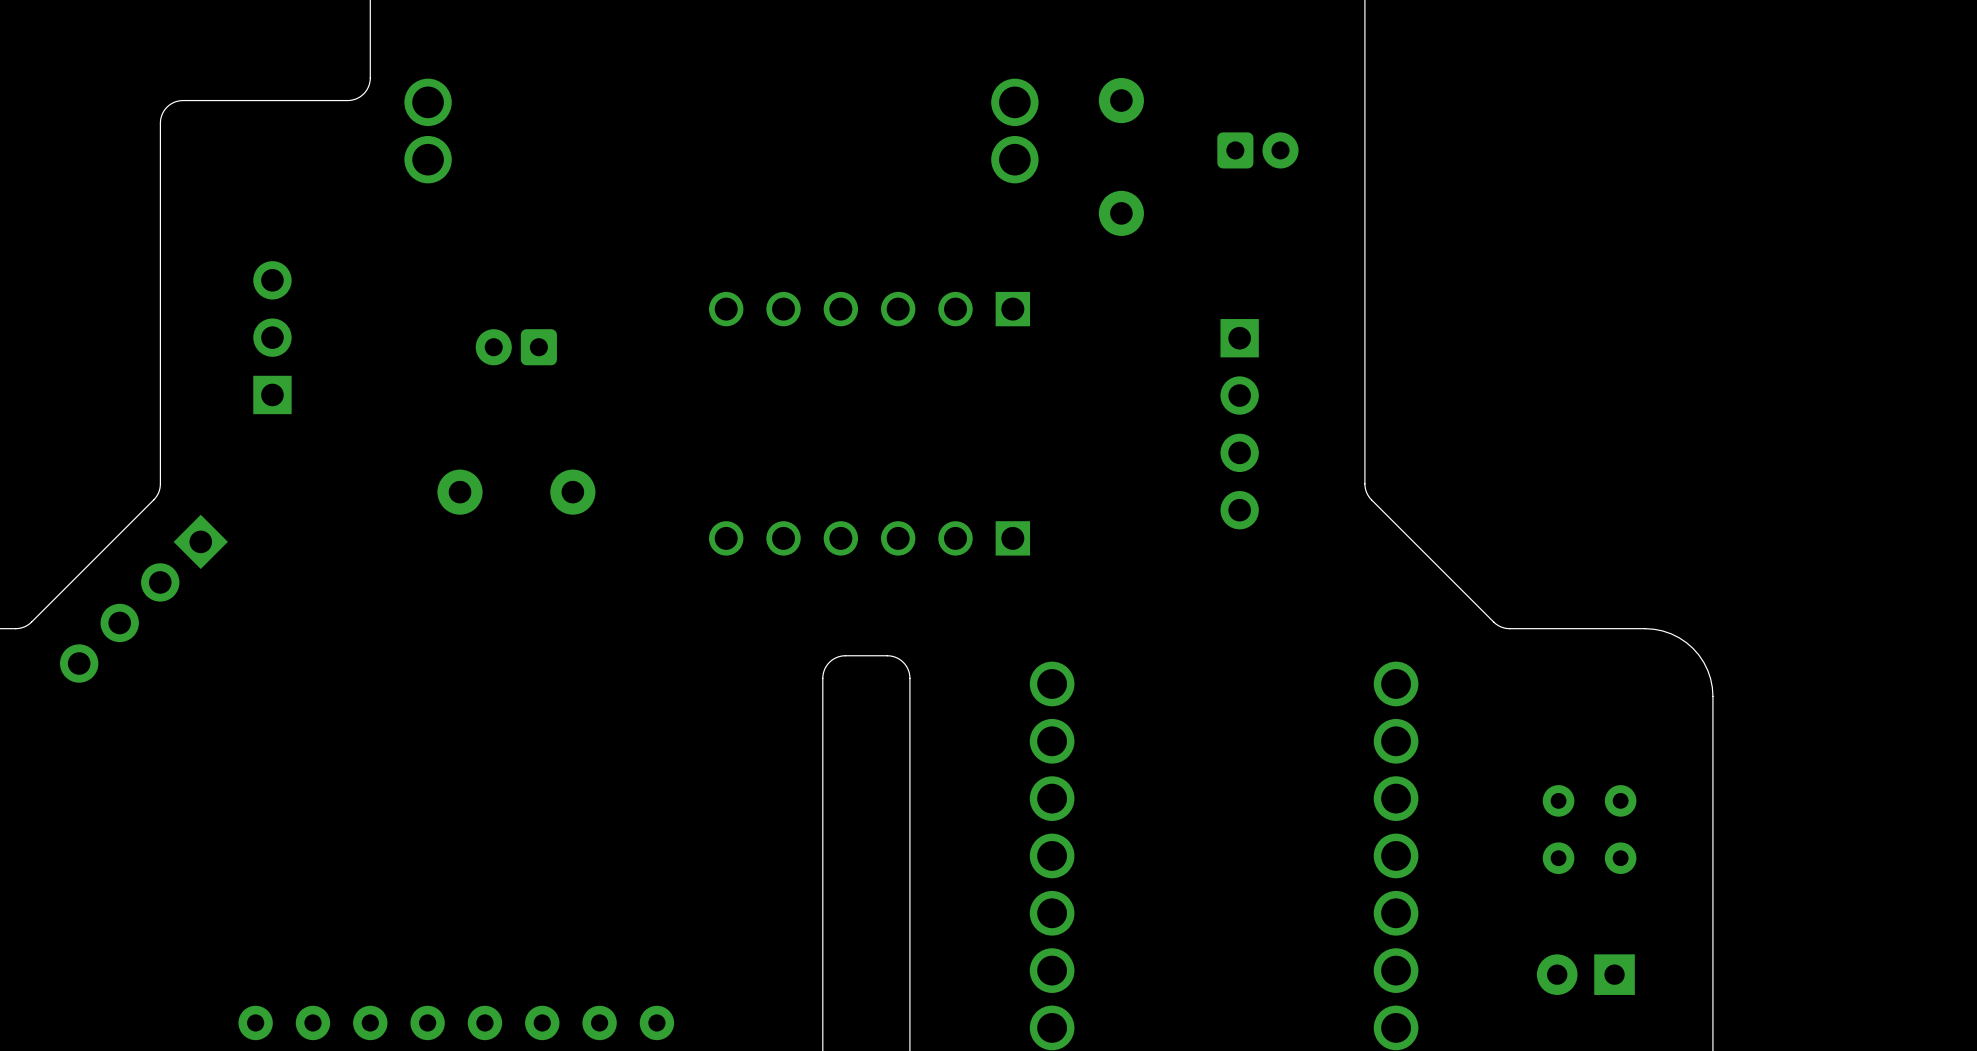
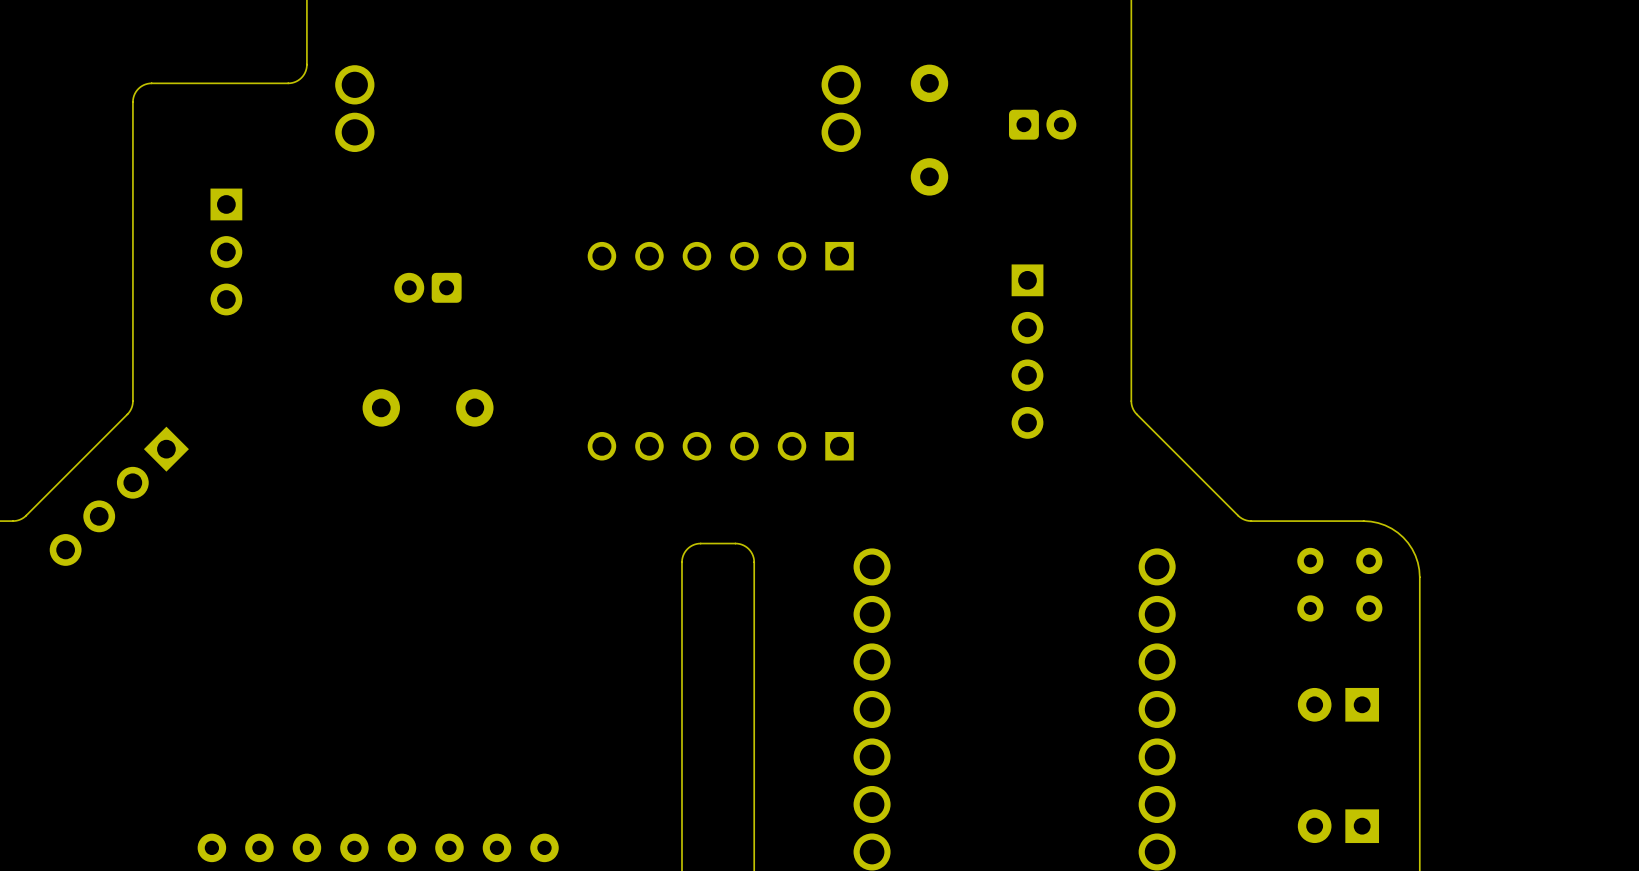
part rotation: 0° (272, 337) -> 180° (226, 251)
part: none -> (1310, 584)
part: none -> (1369, 584)
part footprint: [1604, 785, 1637, 875] -> [1297, 687, 1380, 722]
part: (1558, 829) -> none
part position: (1585, 974) -> (1338, 826)

